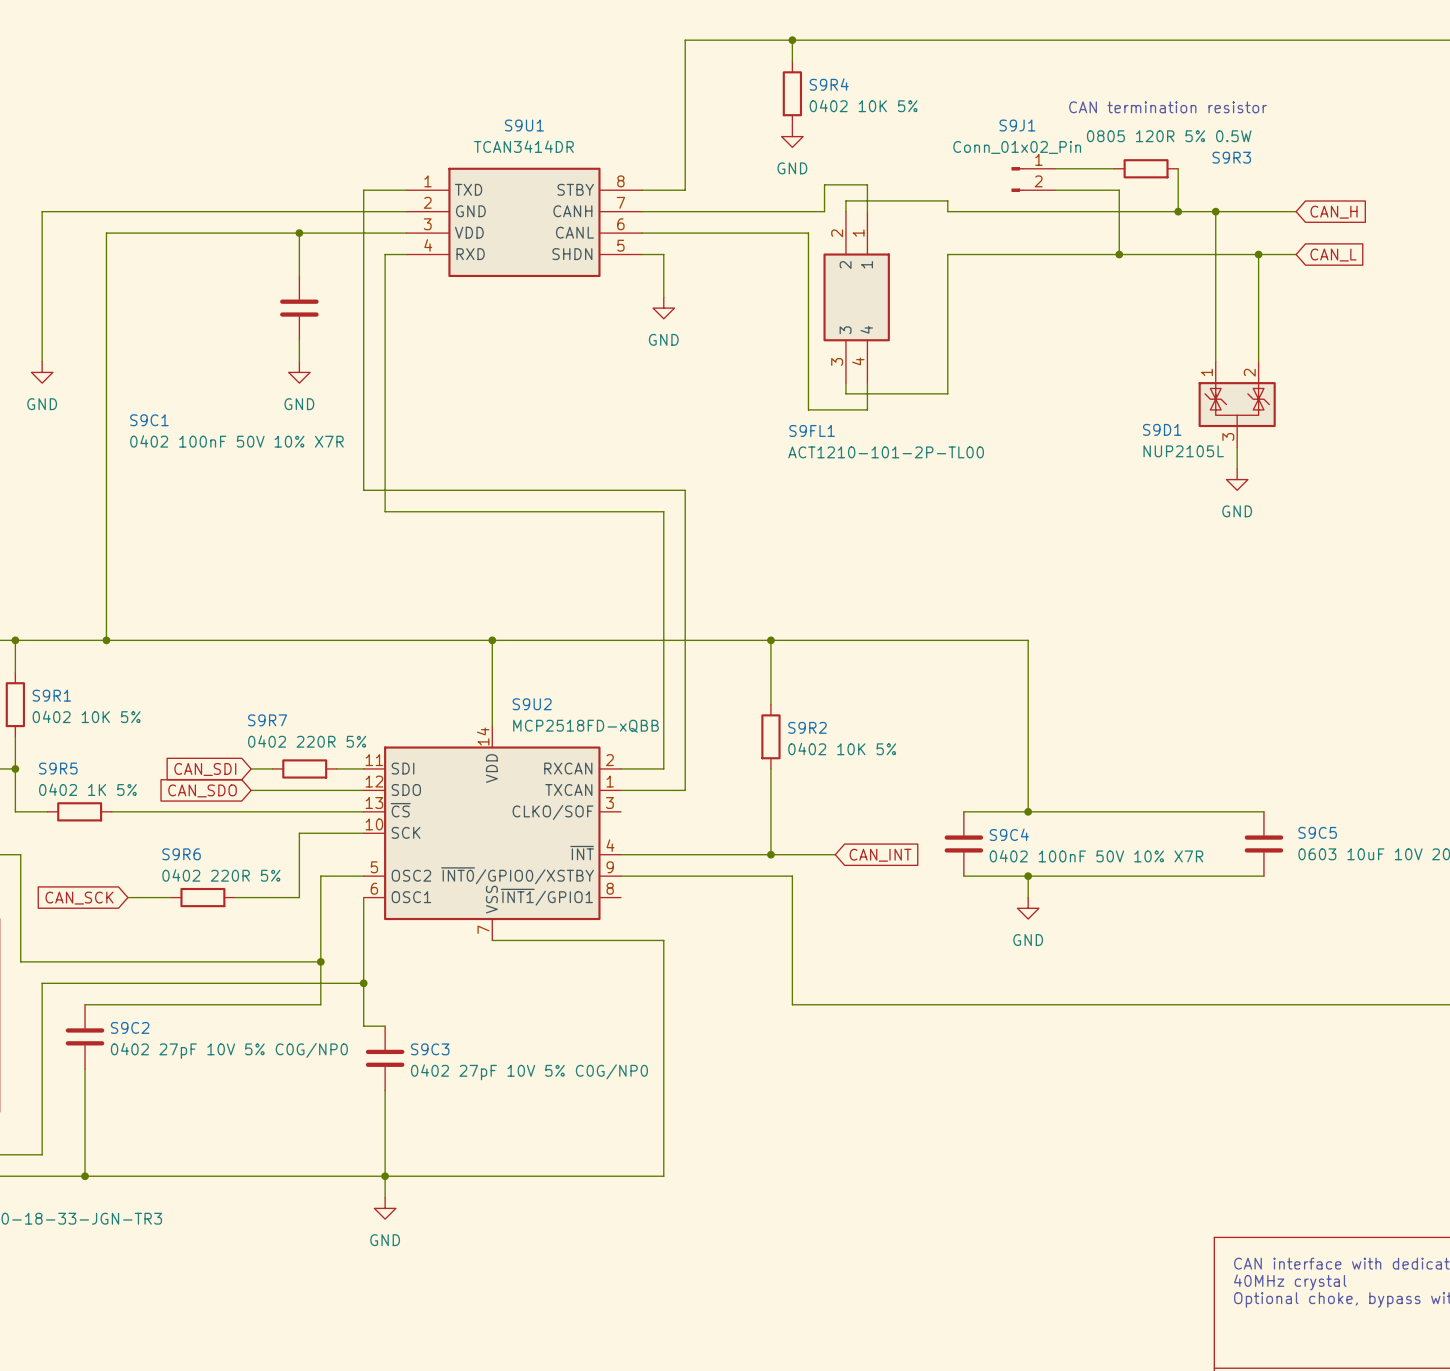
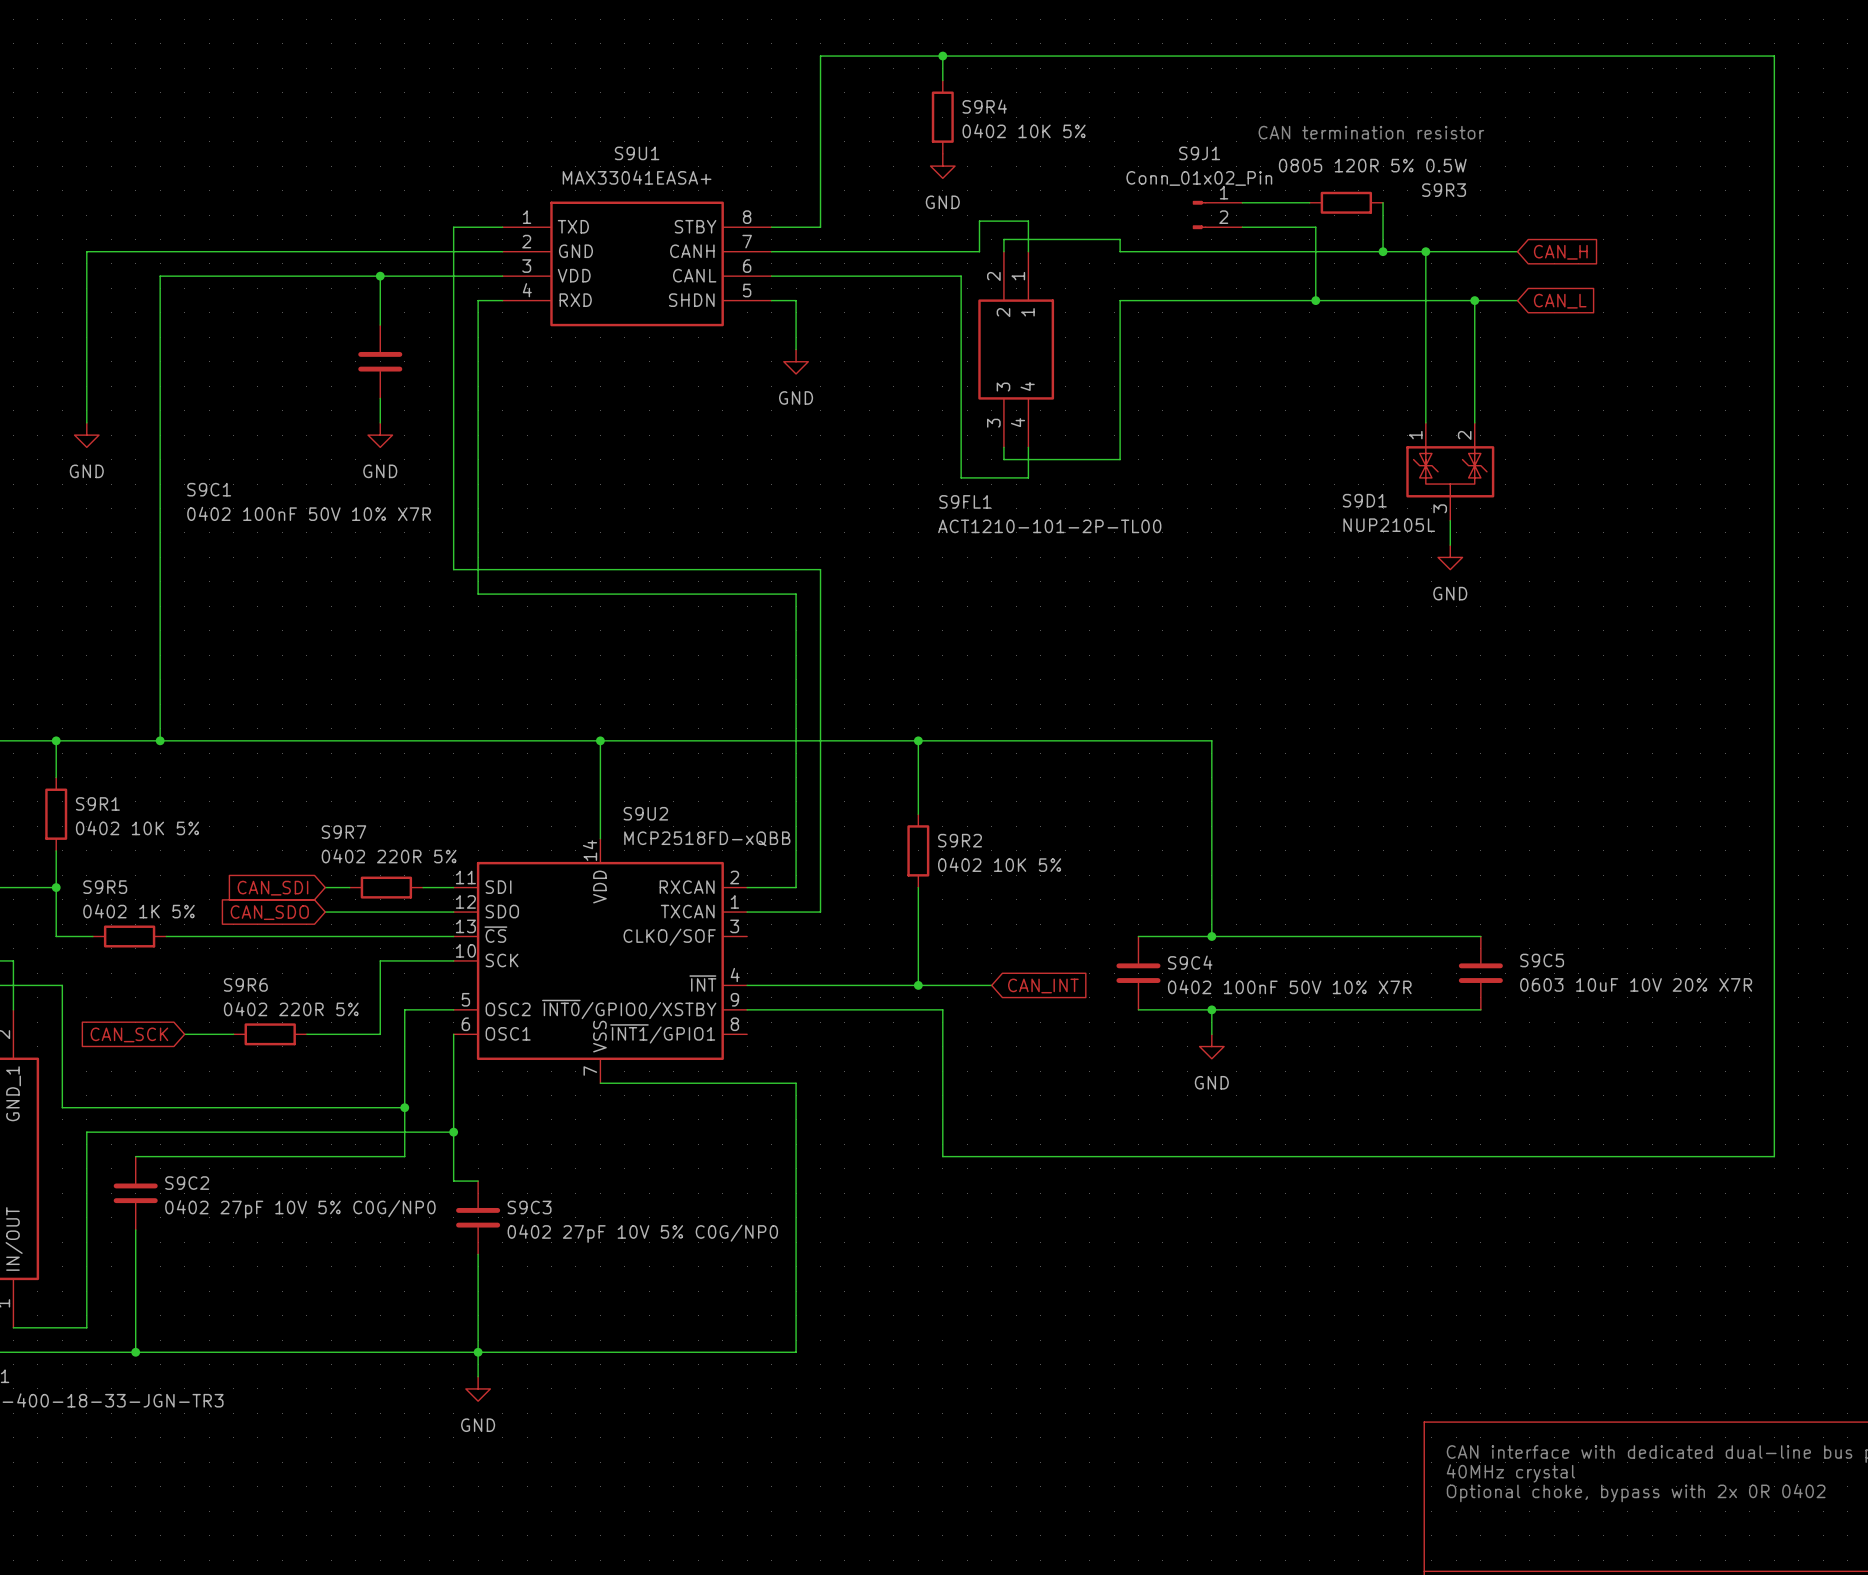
S9U1 value: TCAN3414DR (523, 146) -> MAX33041EASA+ (637, 177)

